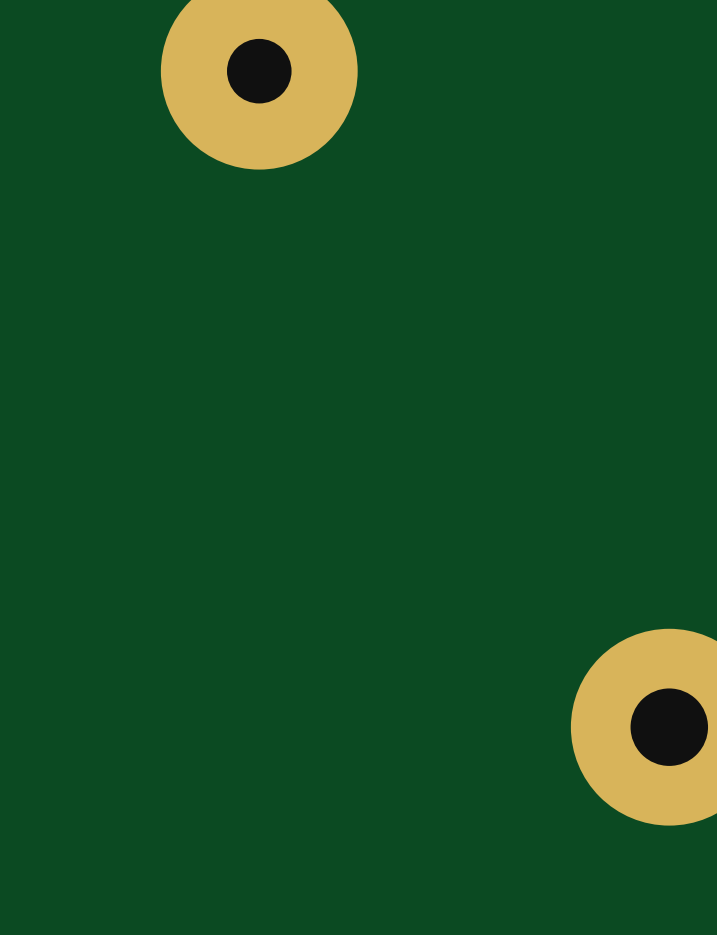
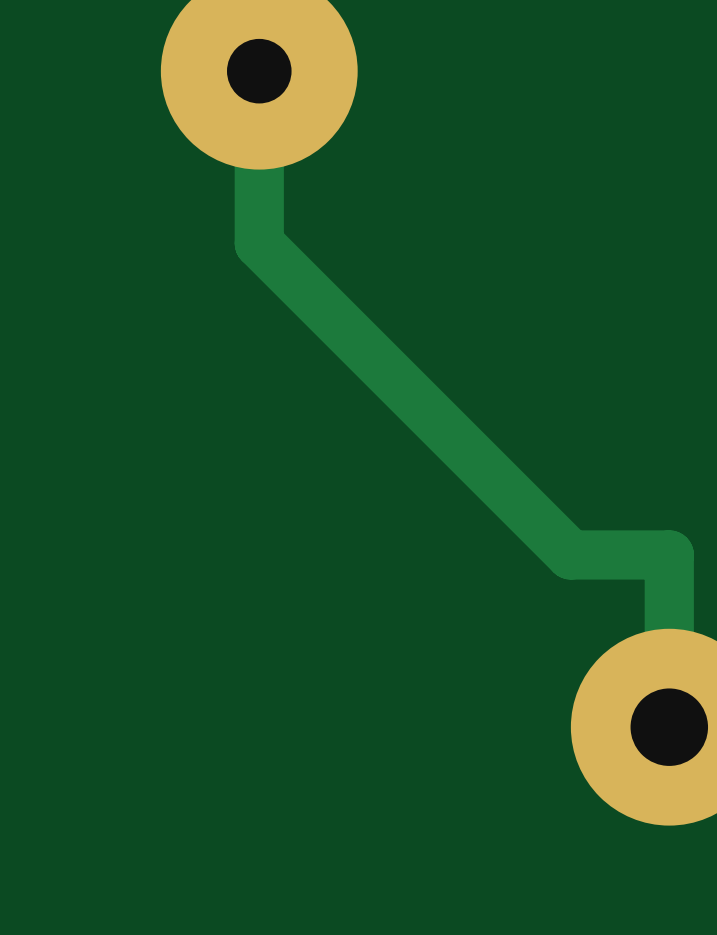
track: none -> (259, 71) (259, 243) (570, 554) (669, 554) (669, 727)

